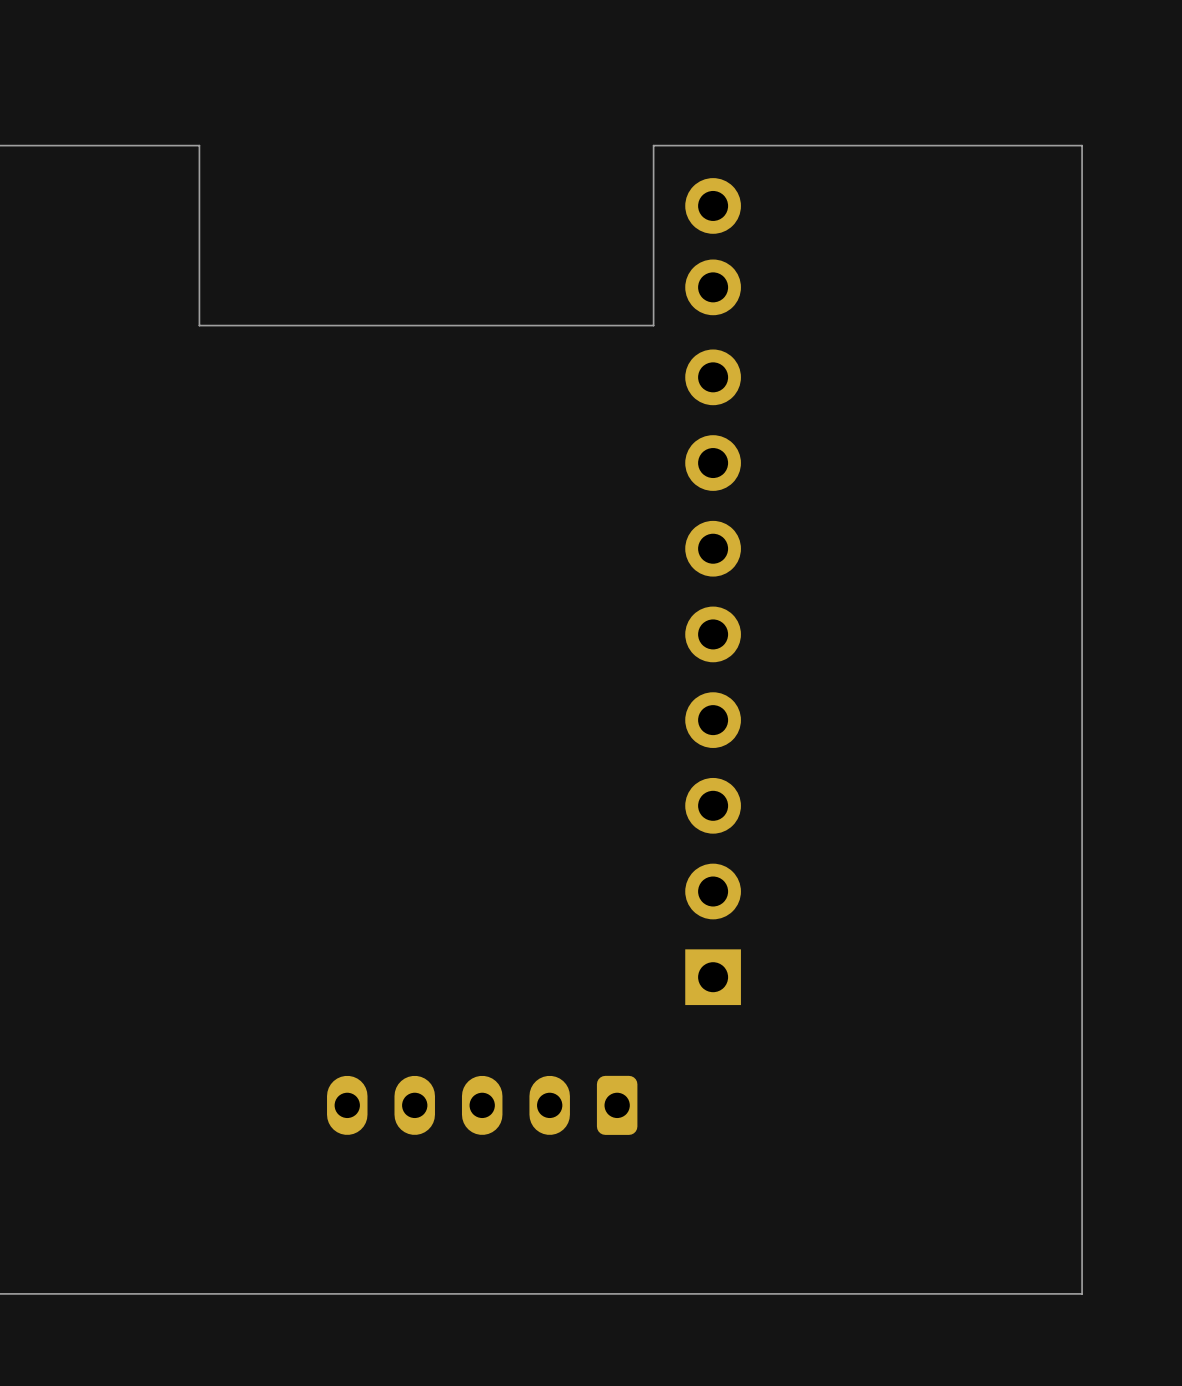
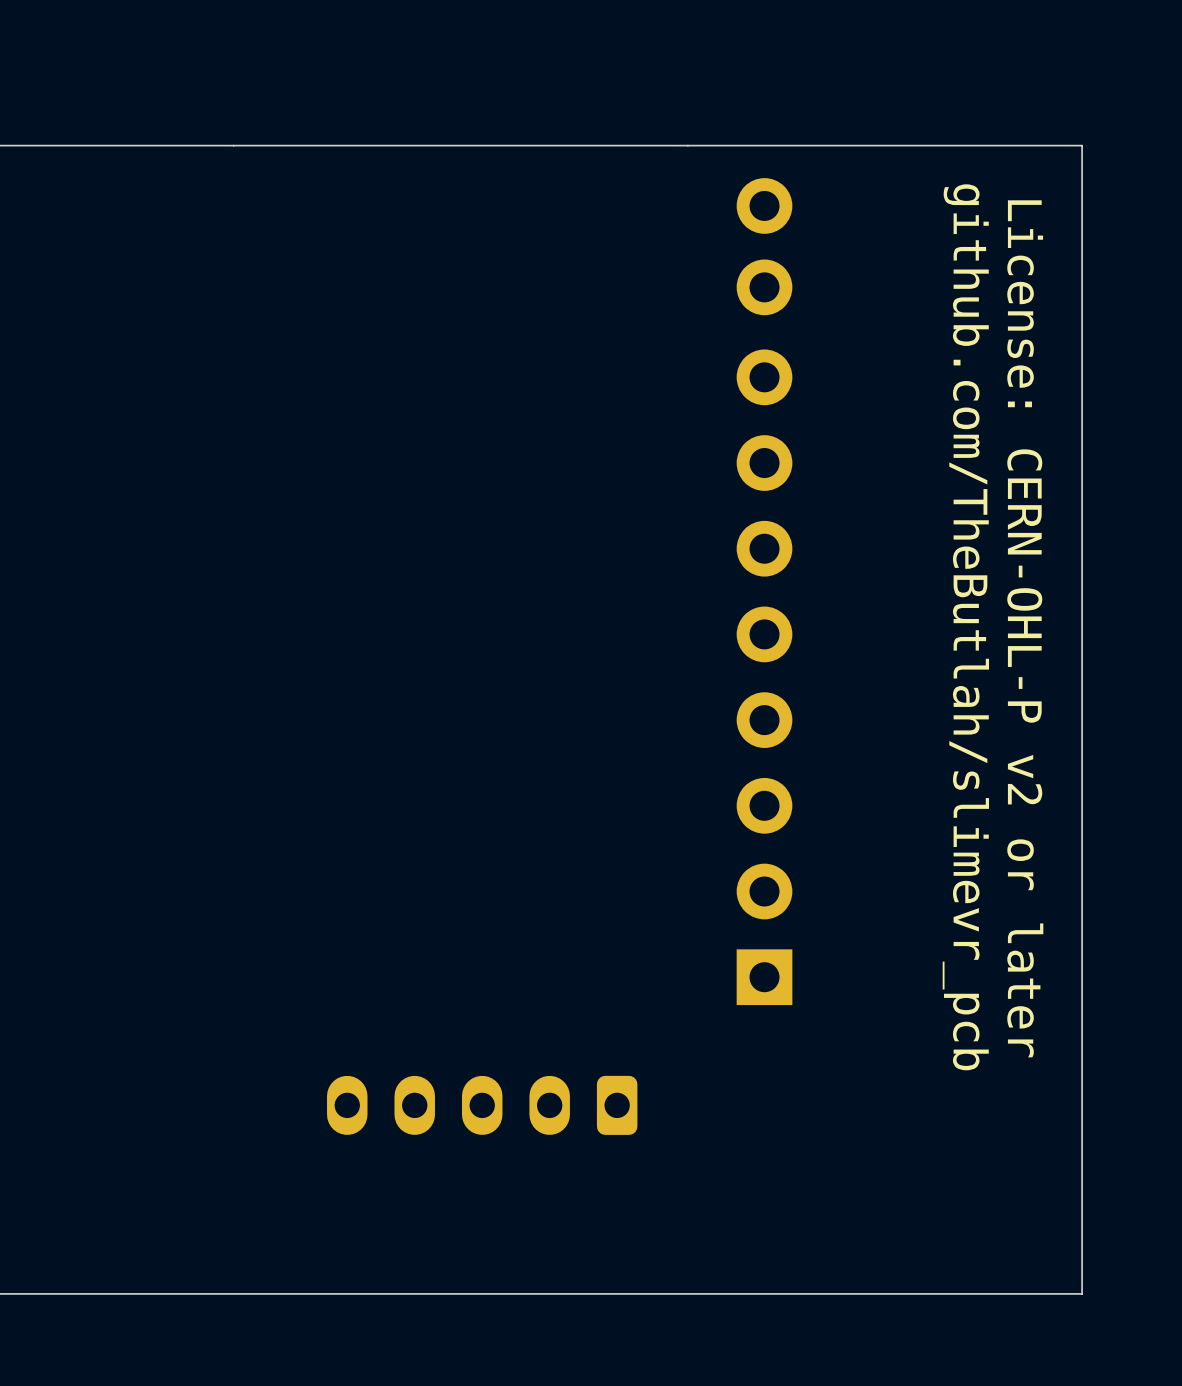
board edge: (653, 145) (653, 325) (199, 325) (199, 145) -> (653, 145) (199, 145)
part position: (713, 591) -> (764, 591)
text: none -> github.com/TheButlah/slimevr_pcb (965, 627)
text: none -> License: CERN-OHL-P v2 or later (1025, 628)

